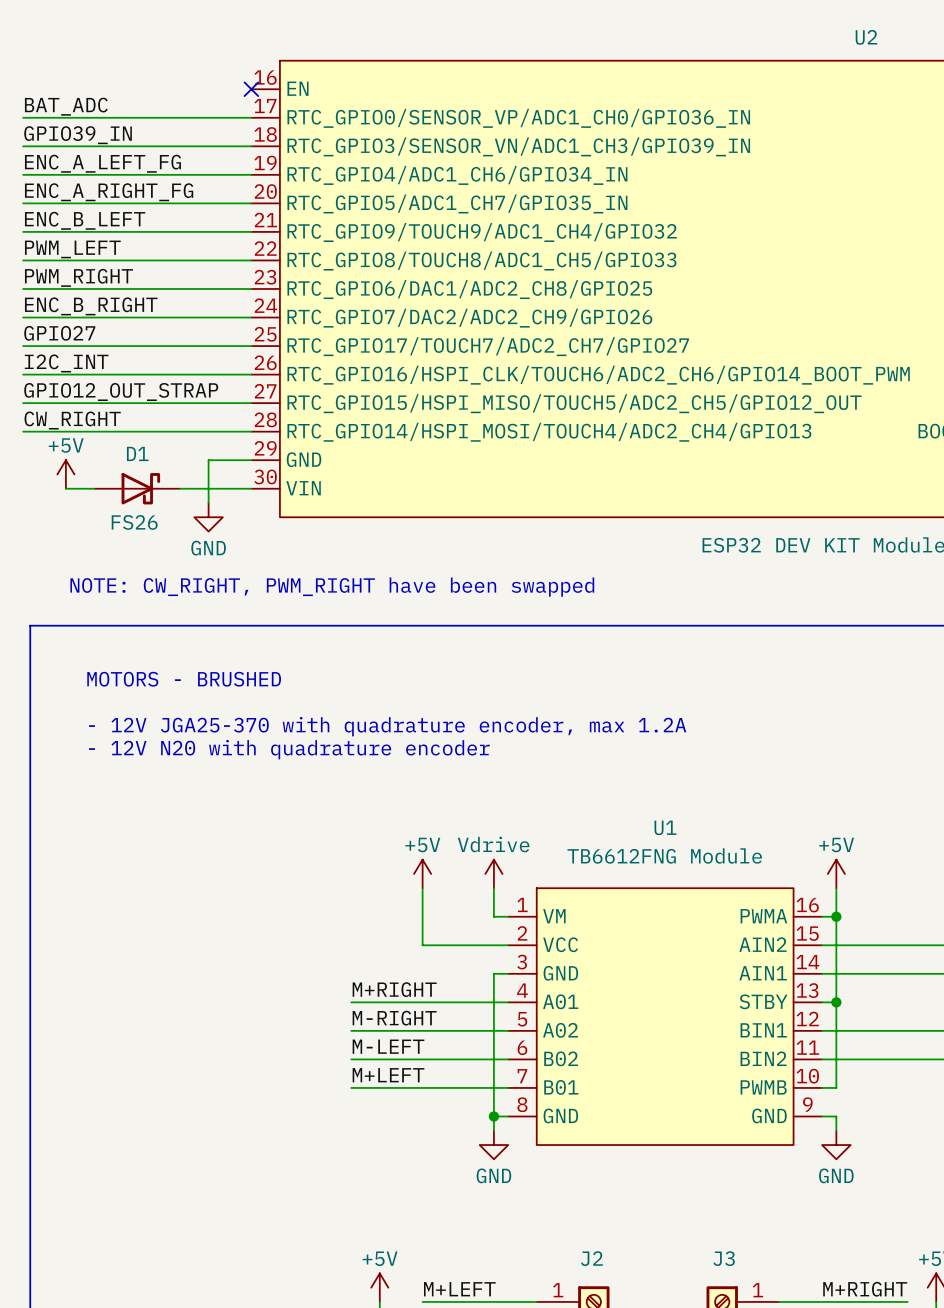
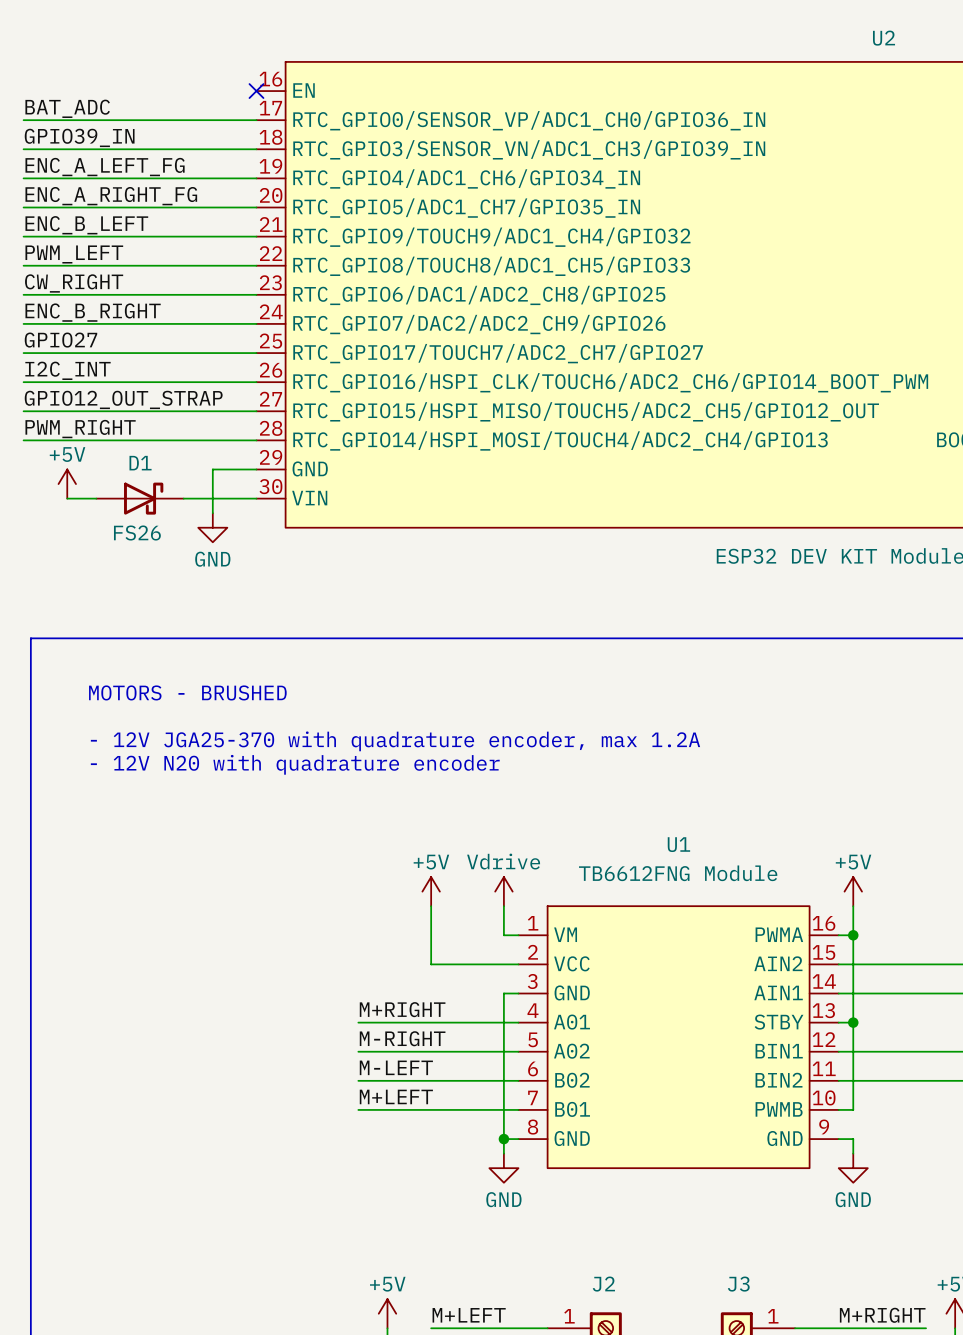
label: PWM_RIGHT (78, 277) -> CW_RIGHT (74, 283)
label: CW_RIGHT (72, 420) -> PWM_RIGHT (80, 429)
text: NOTE: CW_RIGHT, PWM_RIGHT have been swapped (332, 587) -> none

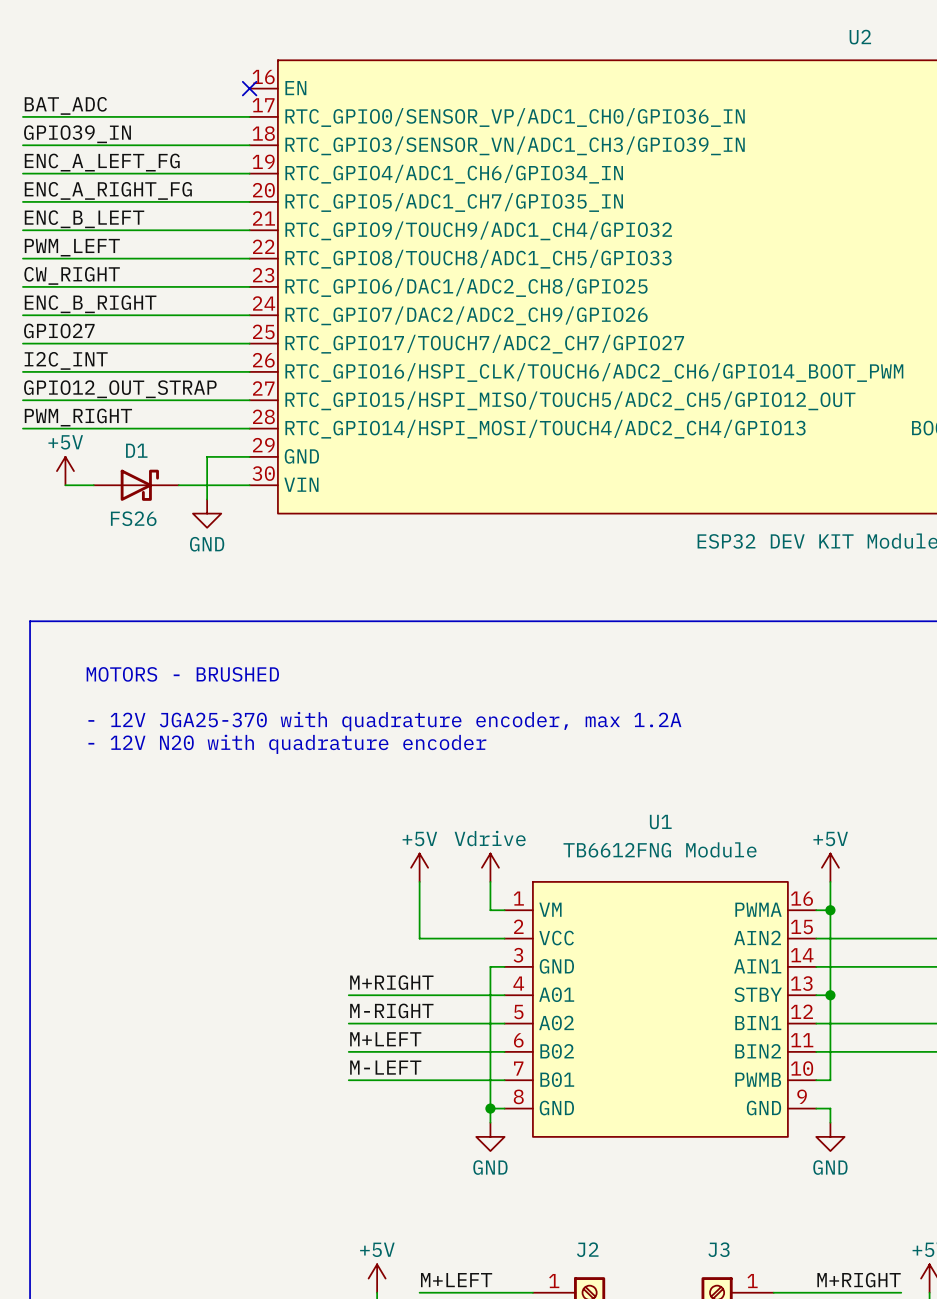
label: M-LEFT (396, 1067) -> M+LEFT (385, 1039)
label: M+LEFT (396, 1096) -> M-LEFT (385, 1067)

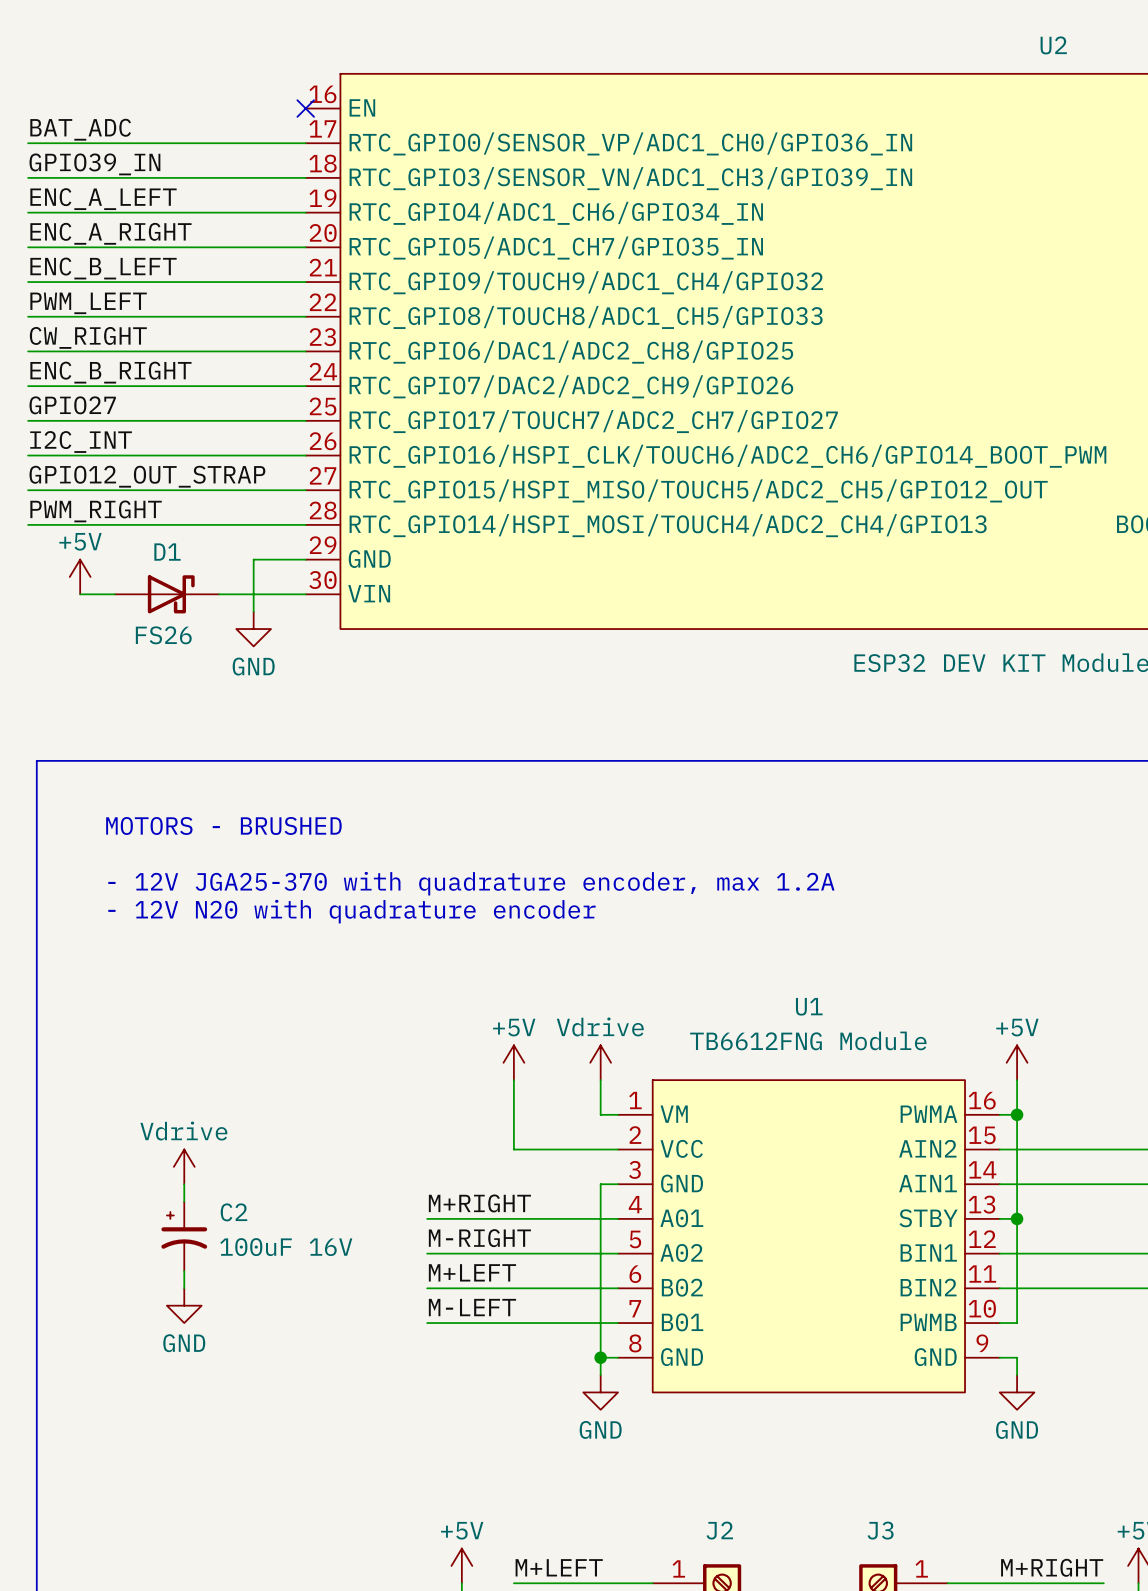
label: ENC_A_LEFT_FG (102, 162) -> ENC_A_LEFT (103, 199)
label: ENC_A_RIGHT_FG (108, 190) -> ENC_A_RIGHT (110, 233)
power symbol: none -> Vdrive (184, 1166)
wire: none -> (184, 1184) (184, 1201)
C2: none -> 100uF 16V (184, 1236)
wire: none -> (184, 1270) (184, 1288)
power symbol: none -> GND (184, 1305)

